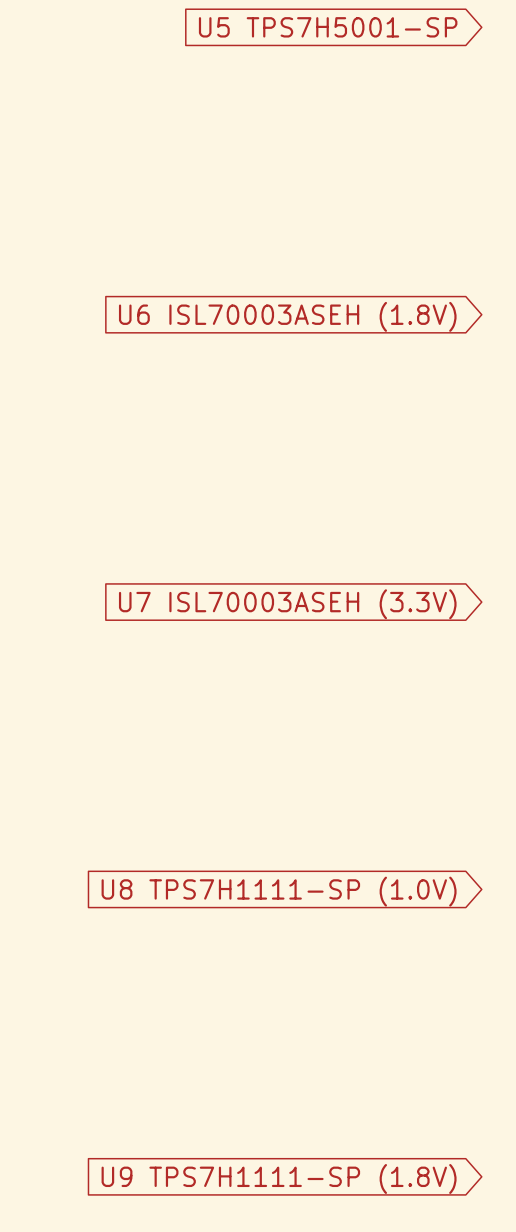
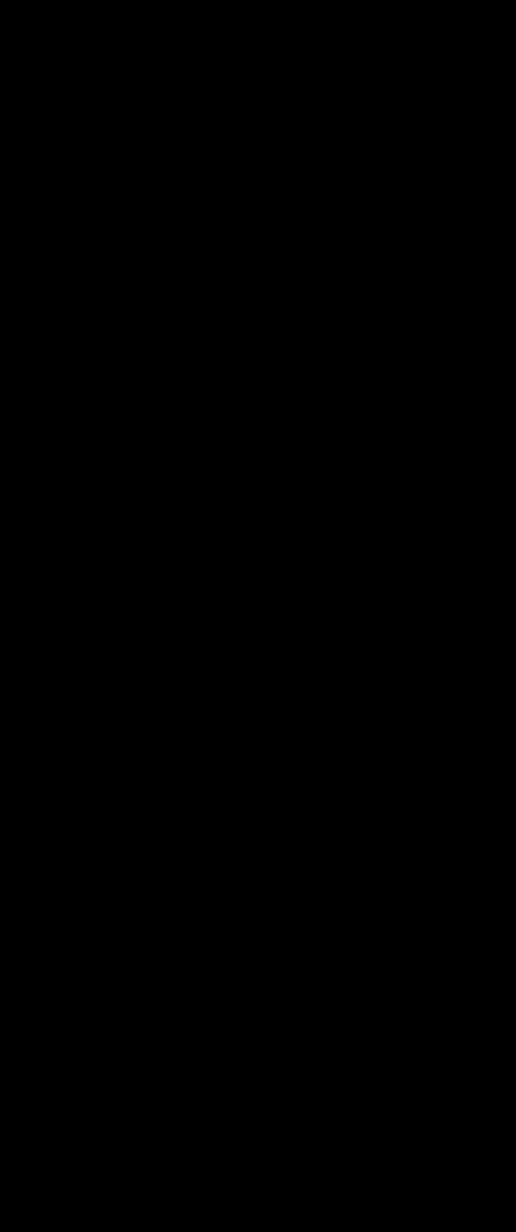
global label: U5 TPS7H5001-SP (328, 27) -> none
global label: U6 ISL70003ASEH (1.8V) (287, 316) -> none
global label: U7 ISL70003ASEH (3.3V) (287, 604) -> none
global label: U8 TPS7H1111-SP (1.0V) (279, 891) -> none
global label: U9 TPS7H1111-SP (1.8V) (279, 1178) -> none

